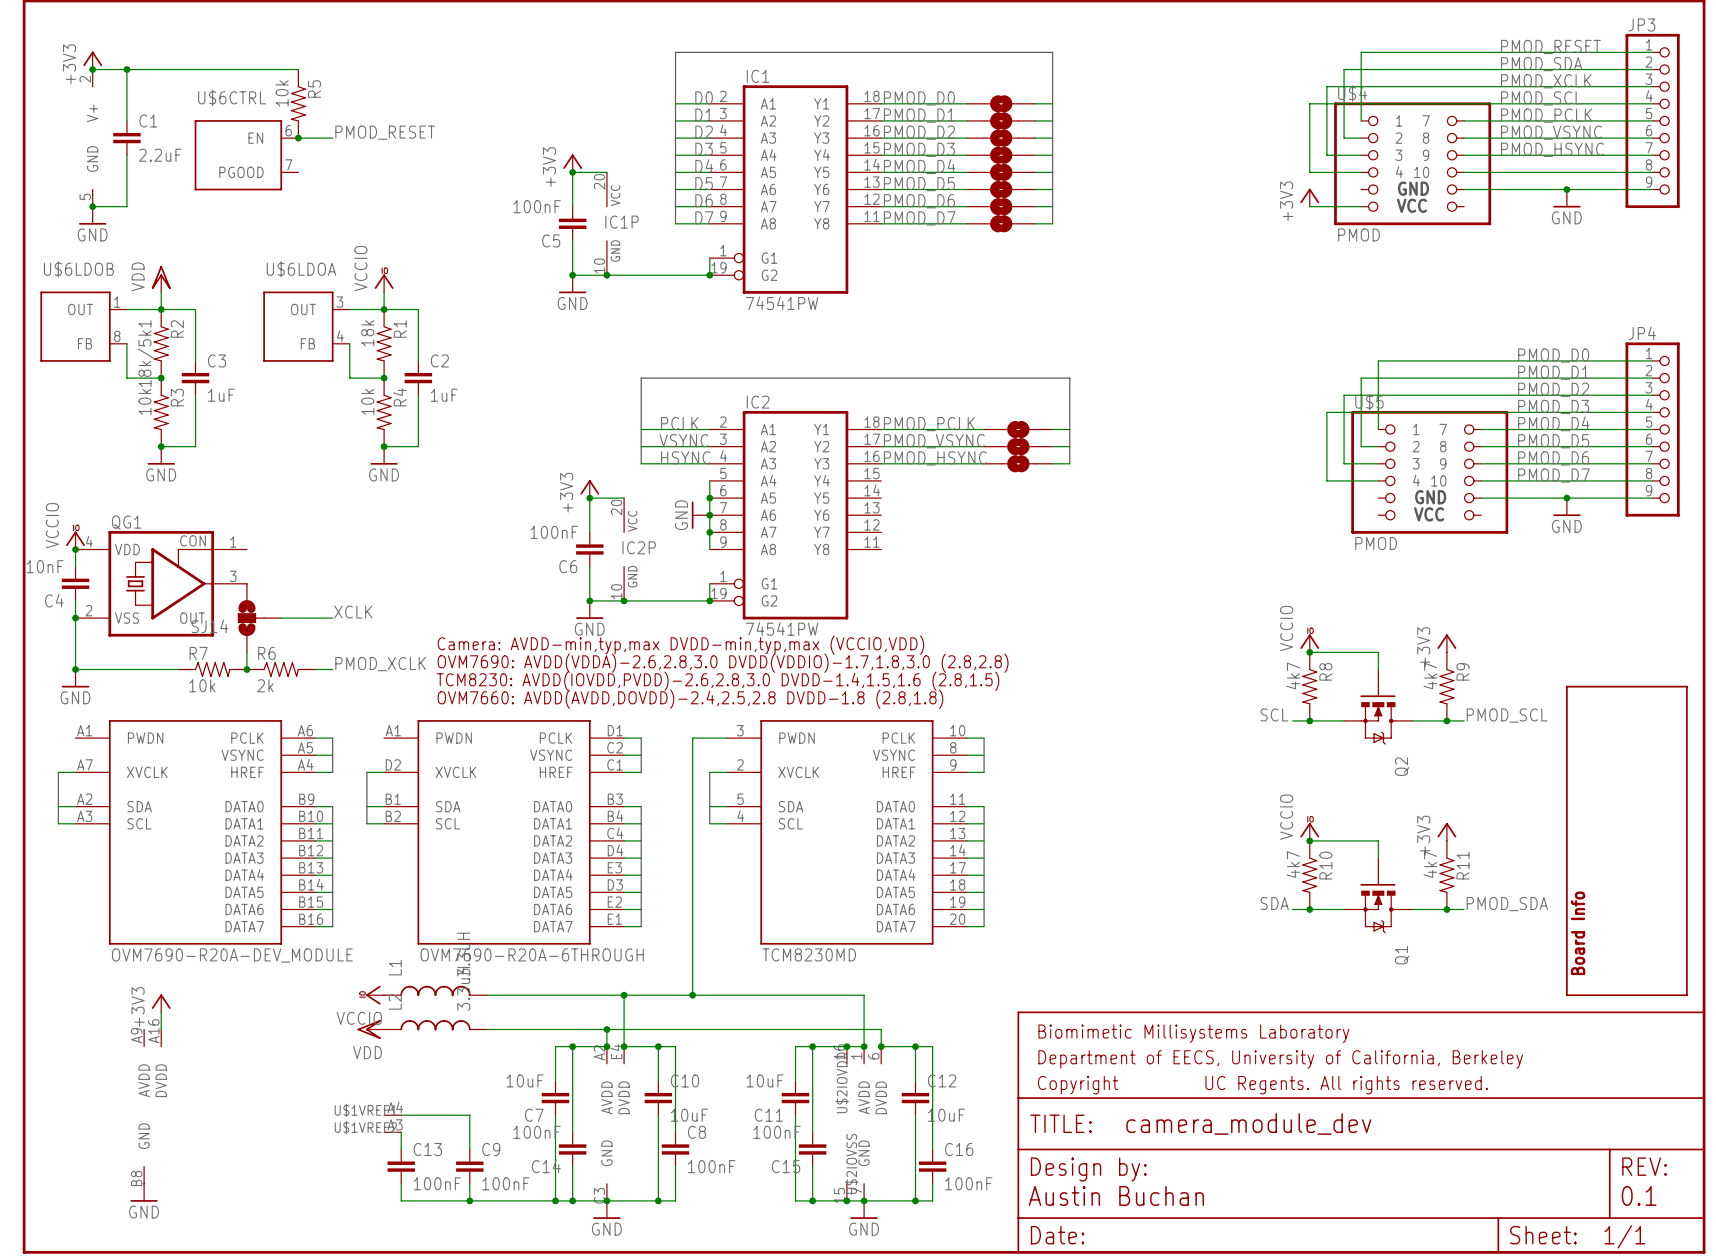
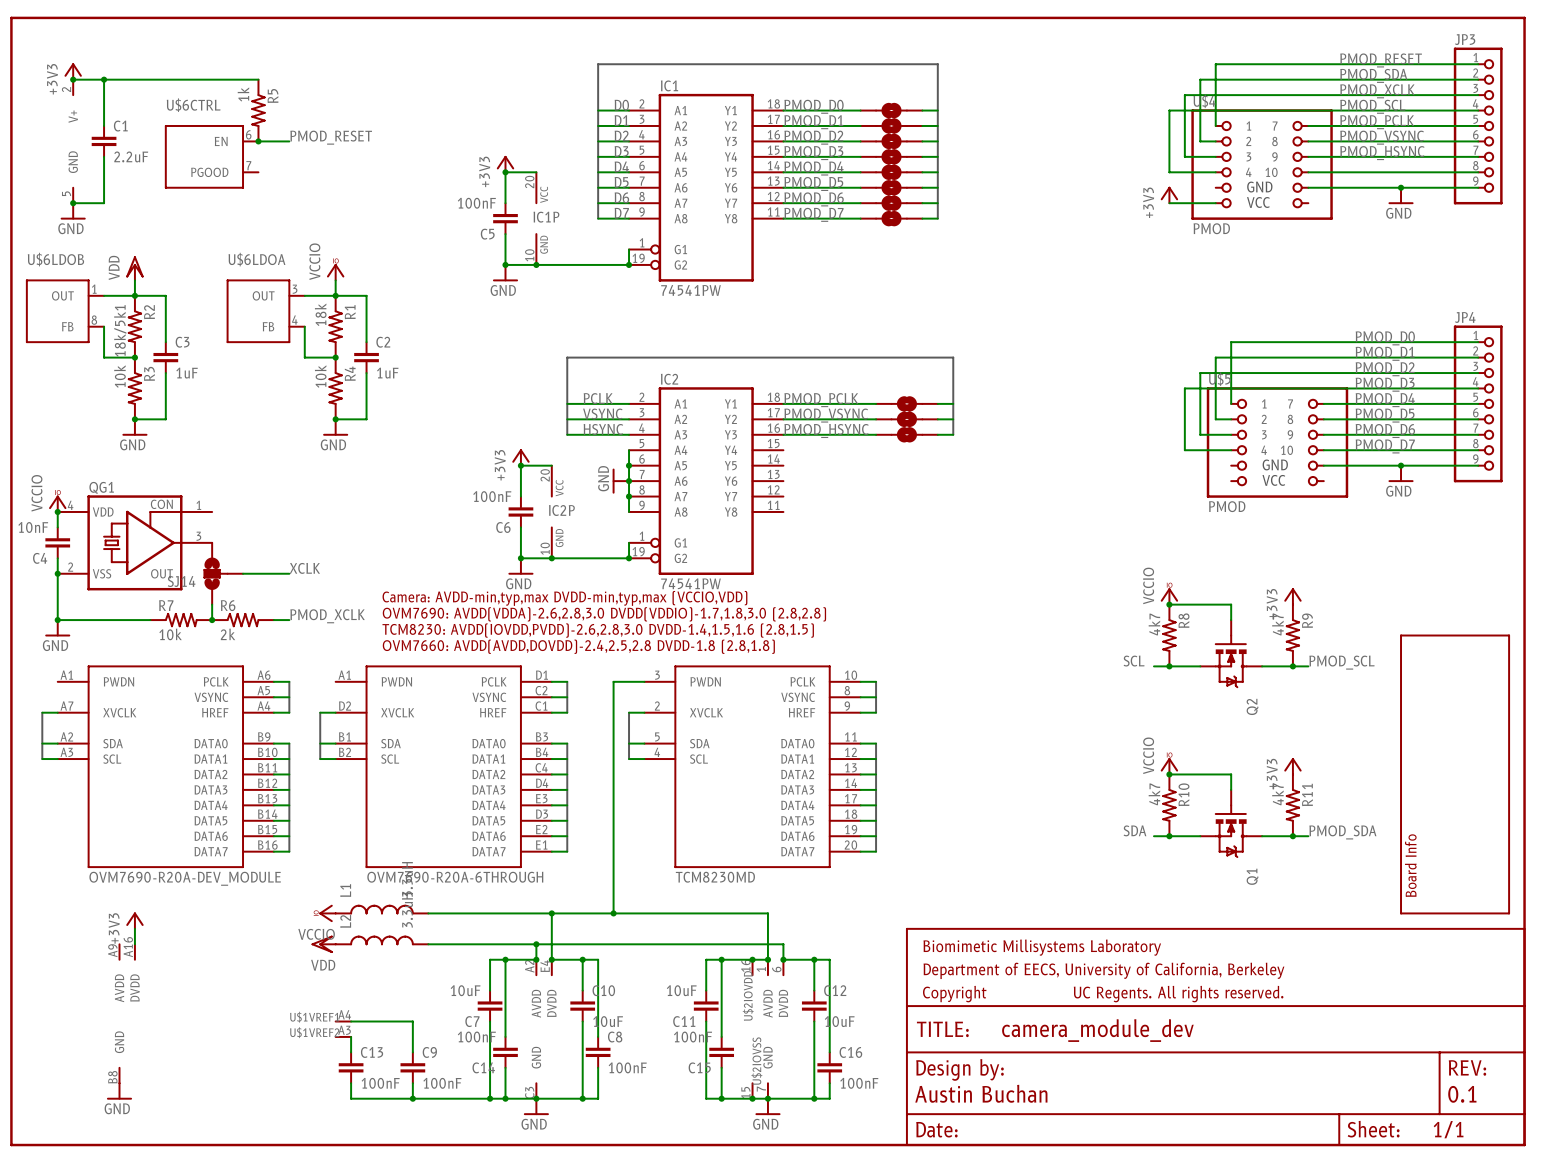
R5 value: 10k (282, 93) -> 1k (243, 94)

